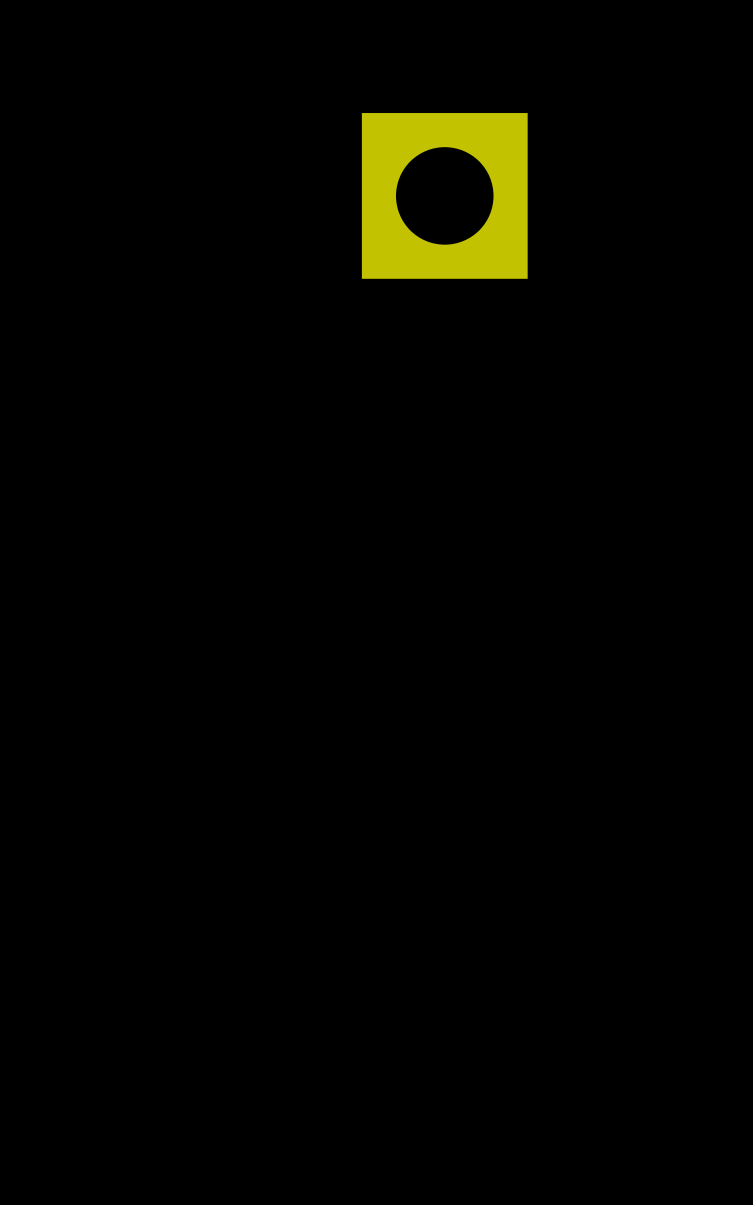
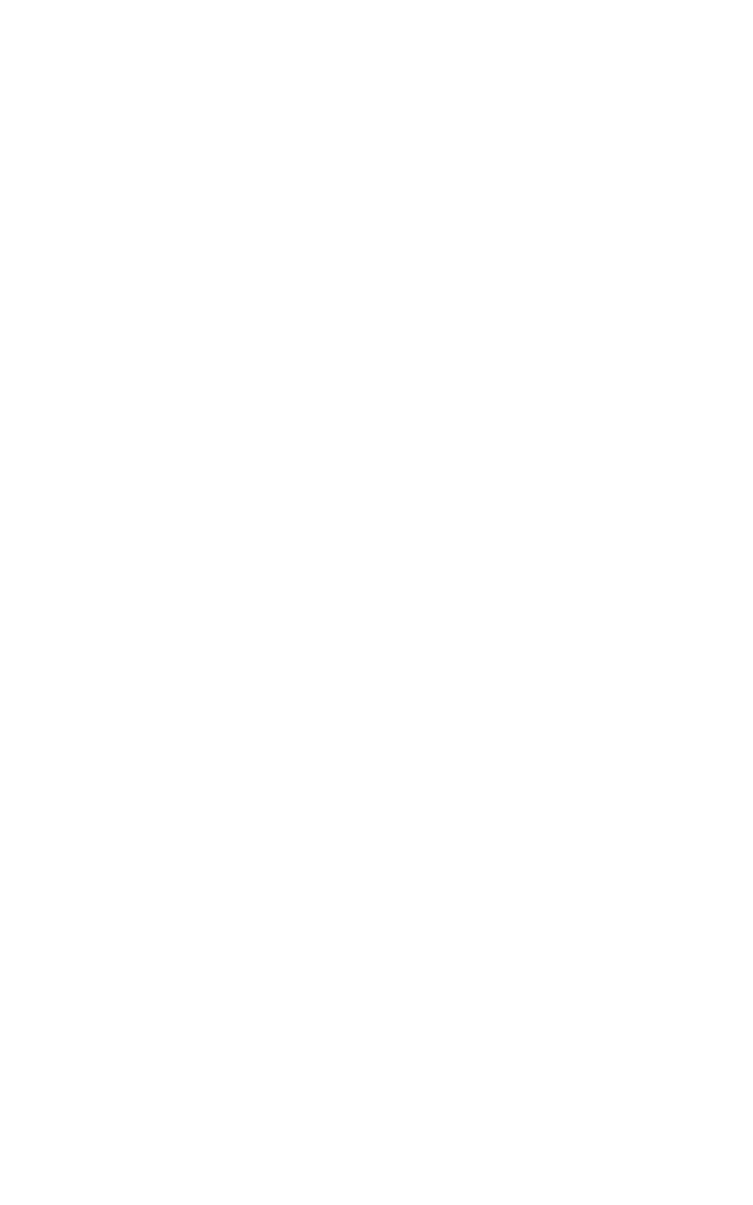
part: (444, 195) -> none

